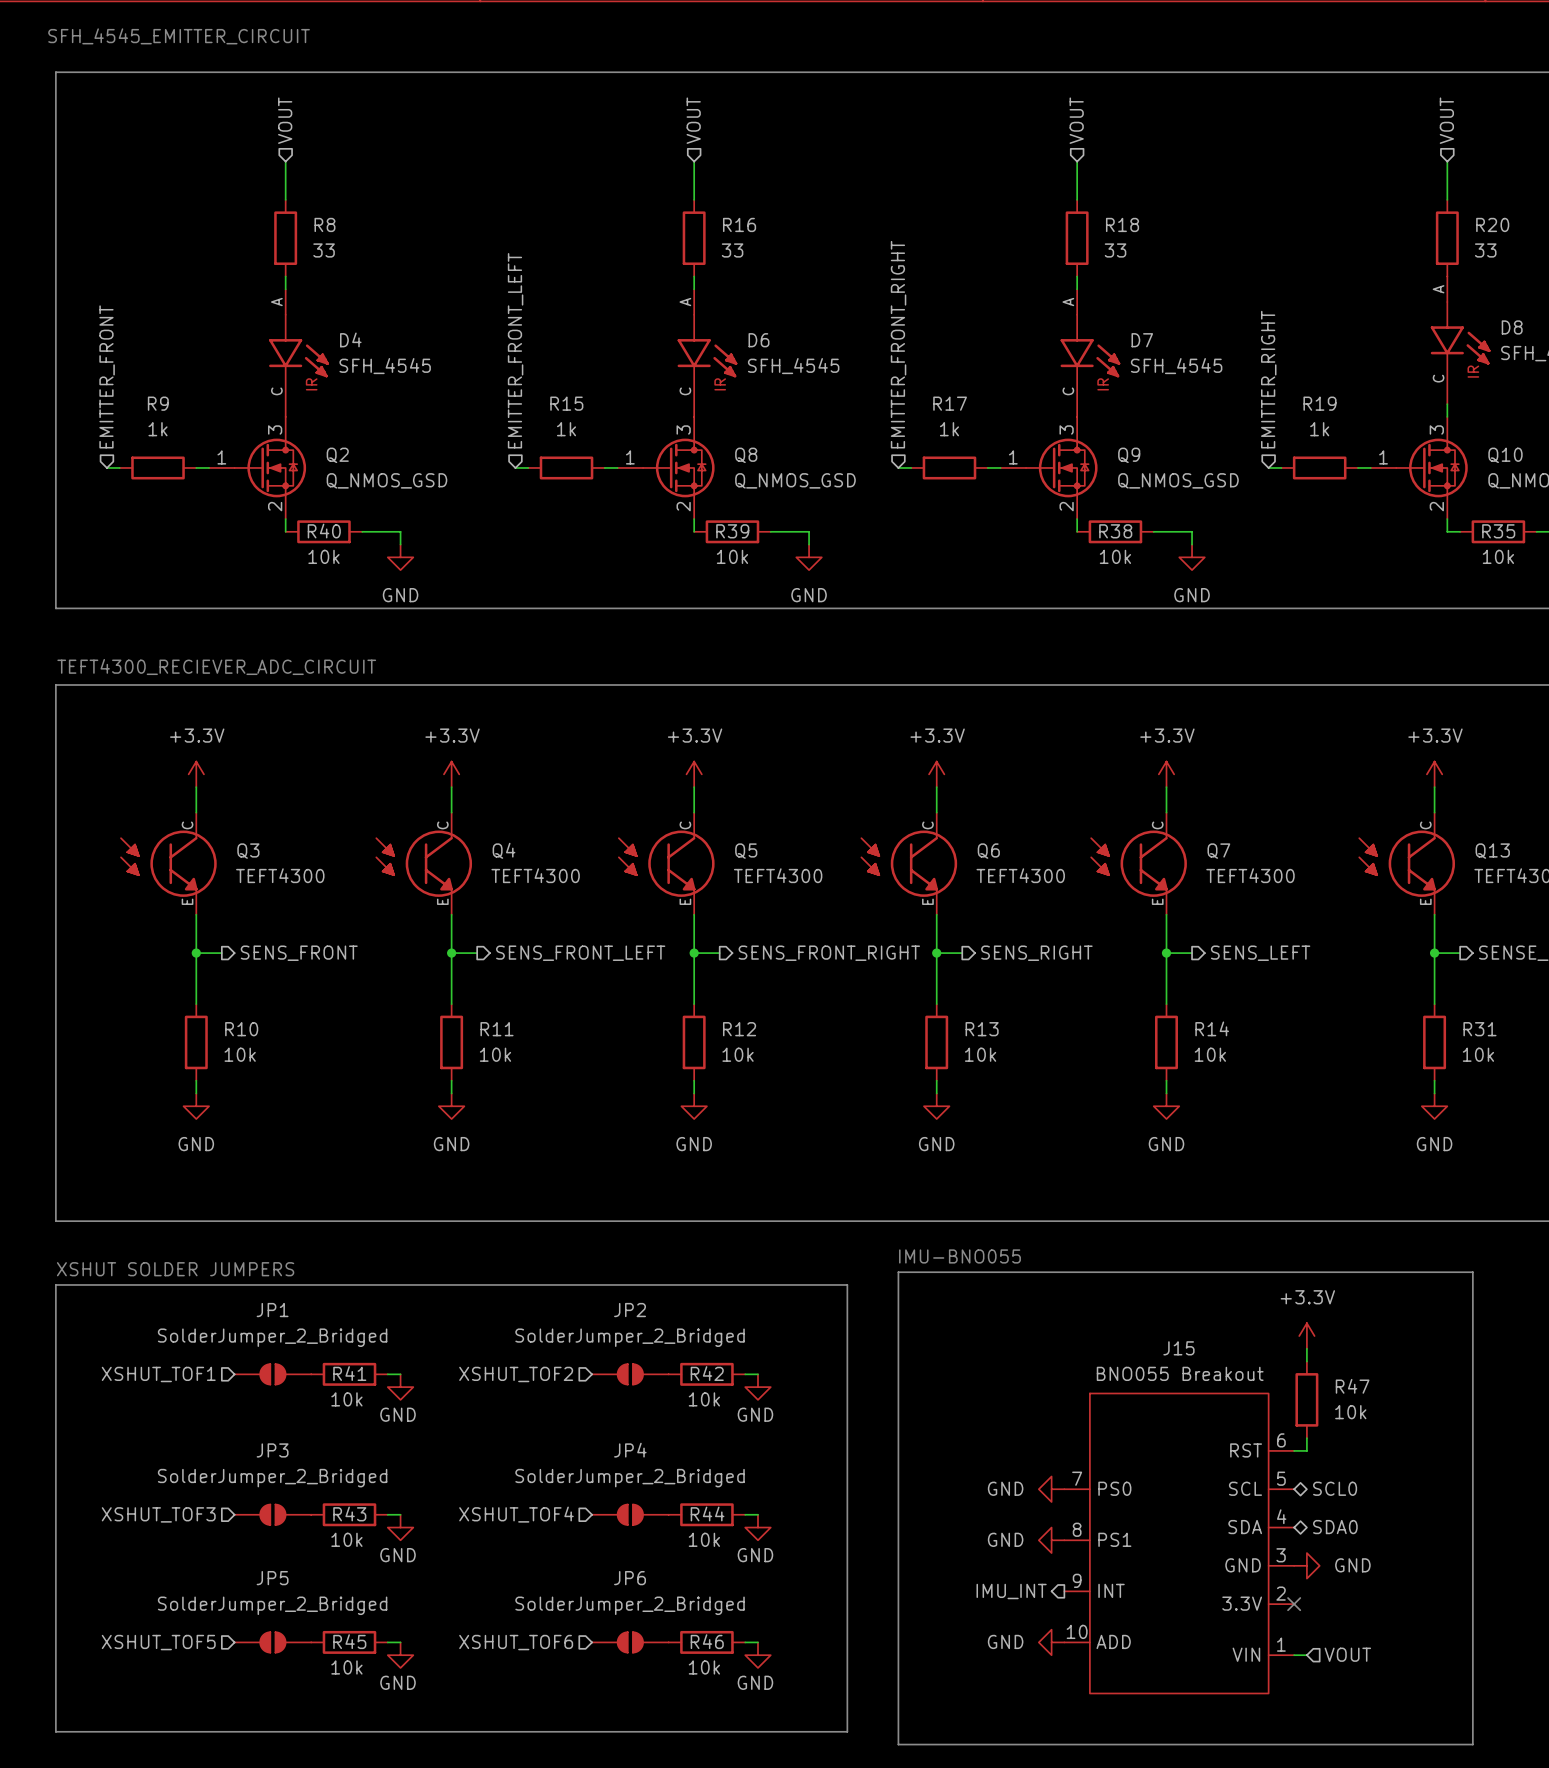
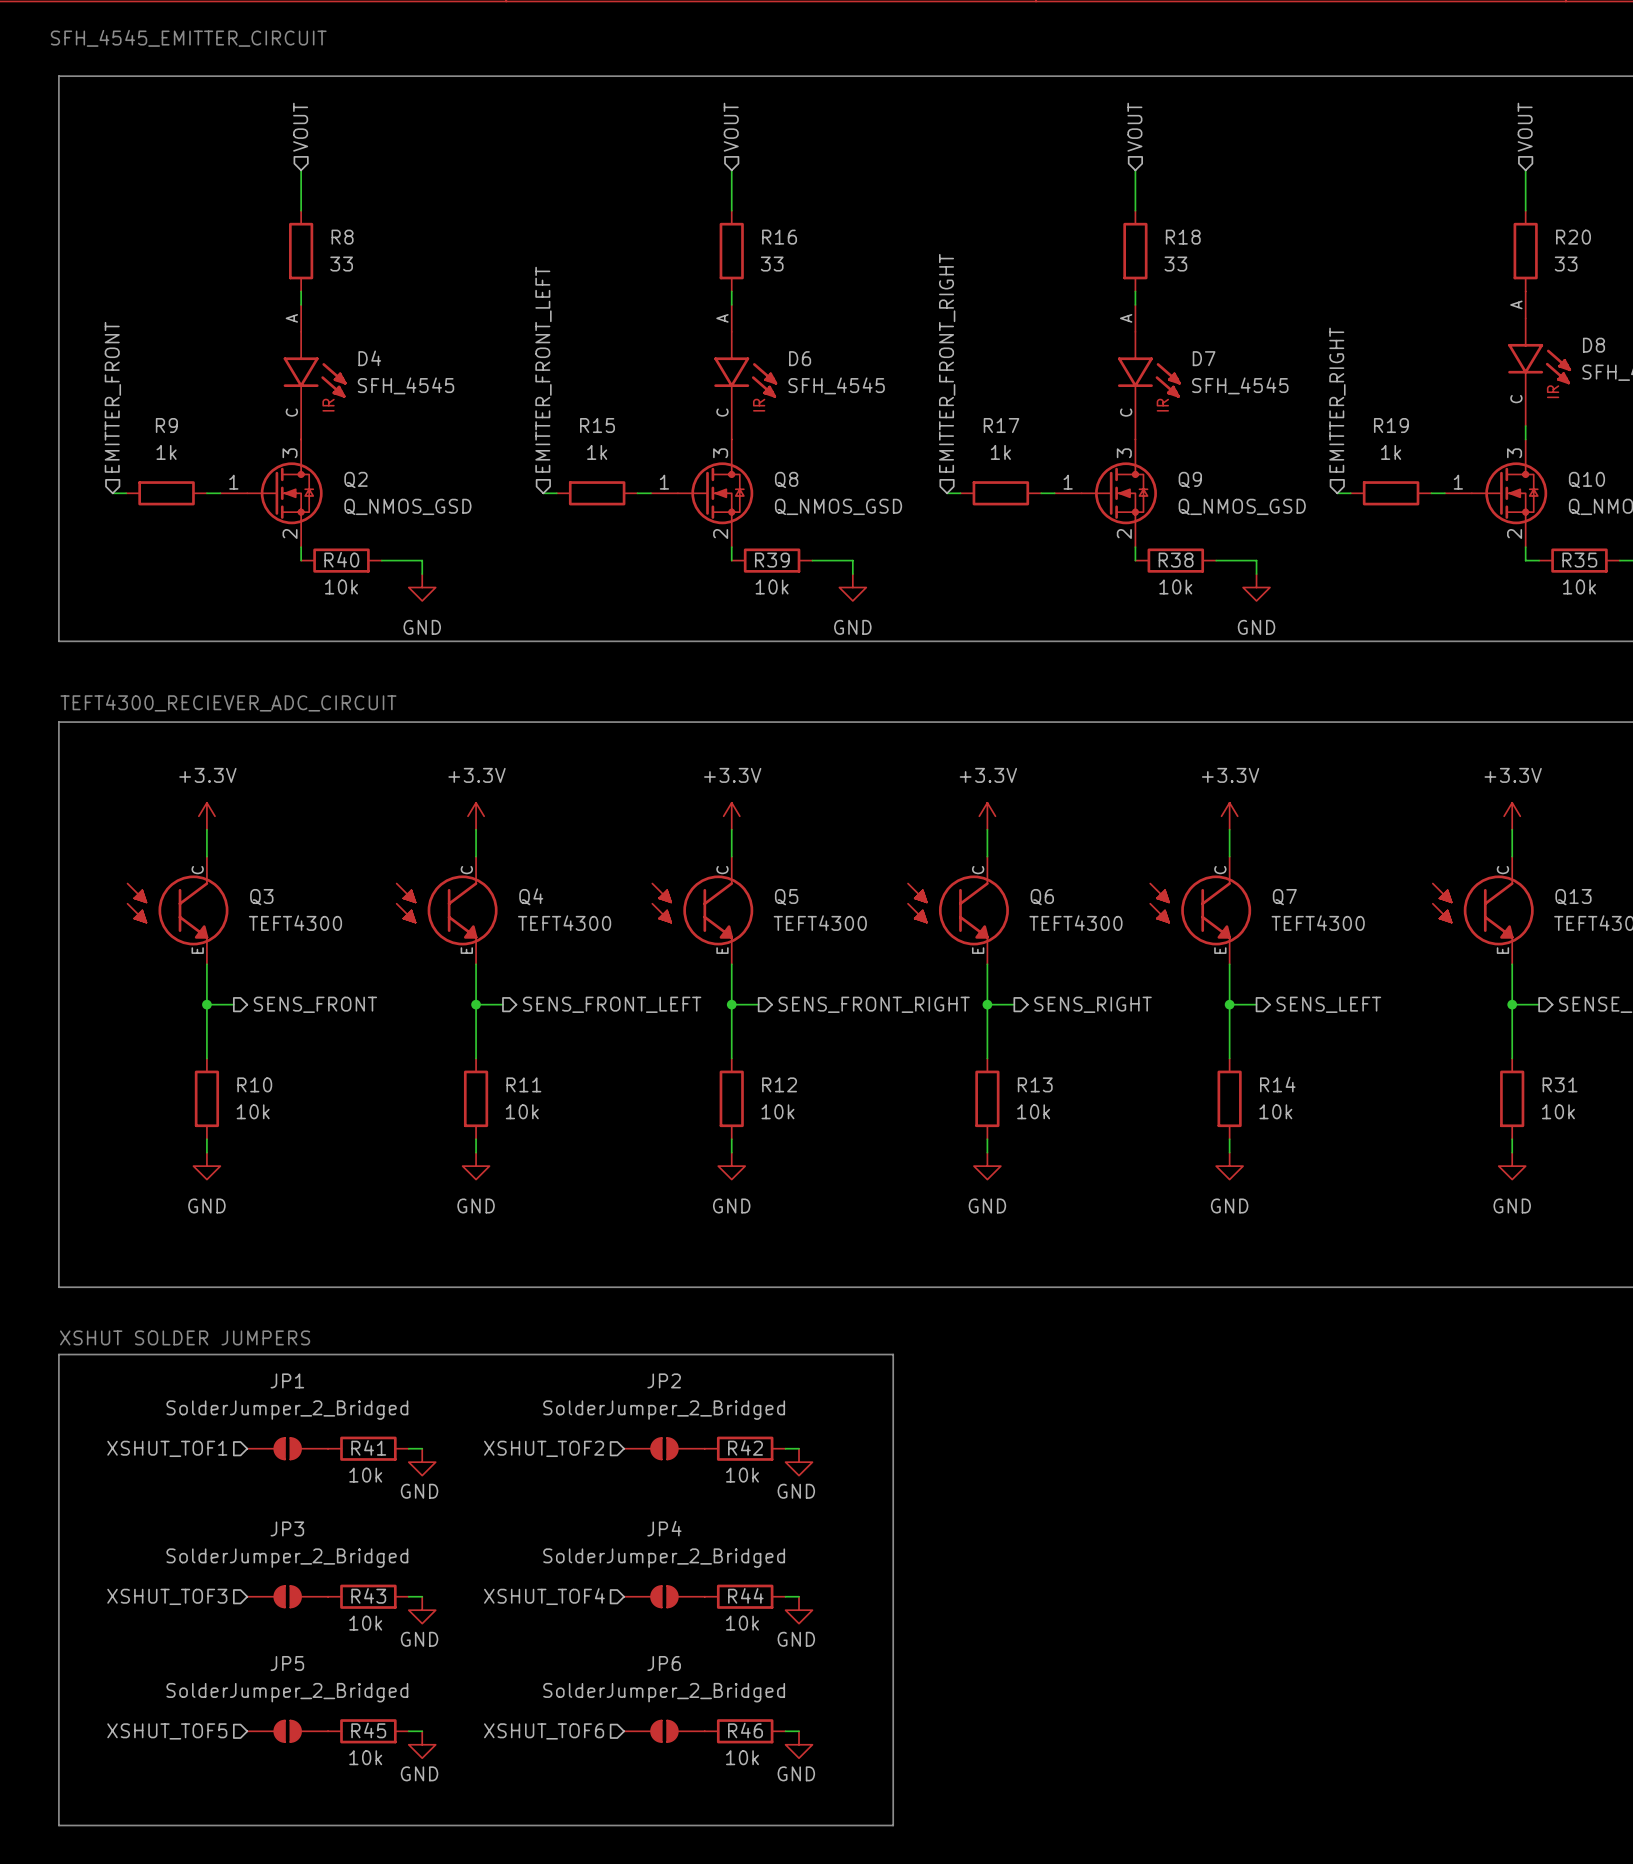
text: IMU-BNO055 (959, 1256) -> none
line: (898, 1272) (1472, 1272) (1472, 1744) (898, 1744) (898, 1272) -> none
power symbol: +3.3V (1306, 1336) -> none
wire: (1306, 1348) (1306, 1361) -> none
R47: 10k (1306, 1399) -> none
wire: (1306, 1438) (1306, 1450) (1294, 1450) -> none
hierarchical label: SCL0 (1335, 1488) -> none
power symbol: GND (1051, 1489) -> none
hierarchical label: SDA0 (1335, 1527) -> none
power symbol: GND (1051, 1540) -> none
J15: BNO055 Breakout (1179, 1543) -> none
power symbol: GND (1306, 1565) -> none
hierarchical label: IMU_INT (1011, 1591) -> none
no-connect mark: (1294, 1604) -> none
power symbol: GND (1051, 1642) -> none
hierarchical label: VOUT (1347, 1654) -> none
wire: (1294, 1655) (1306, 1655) -> none

